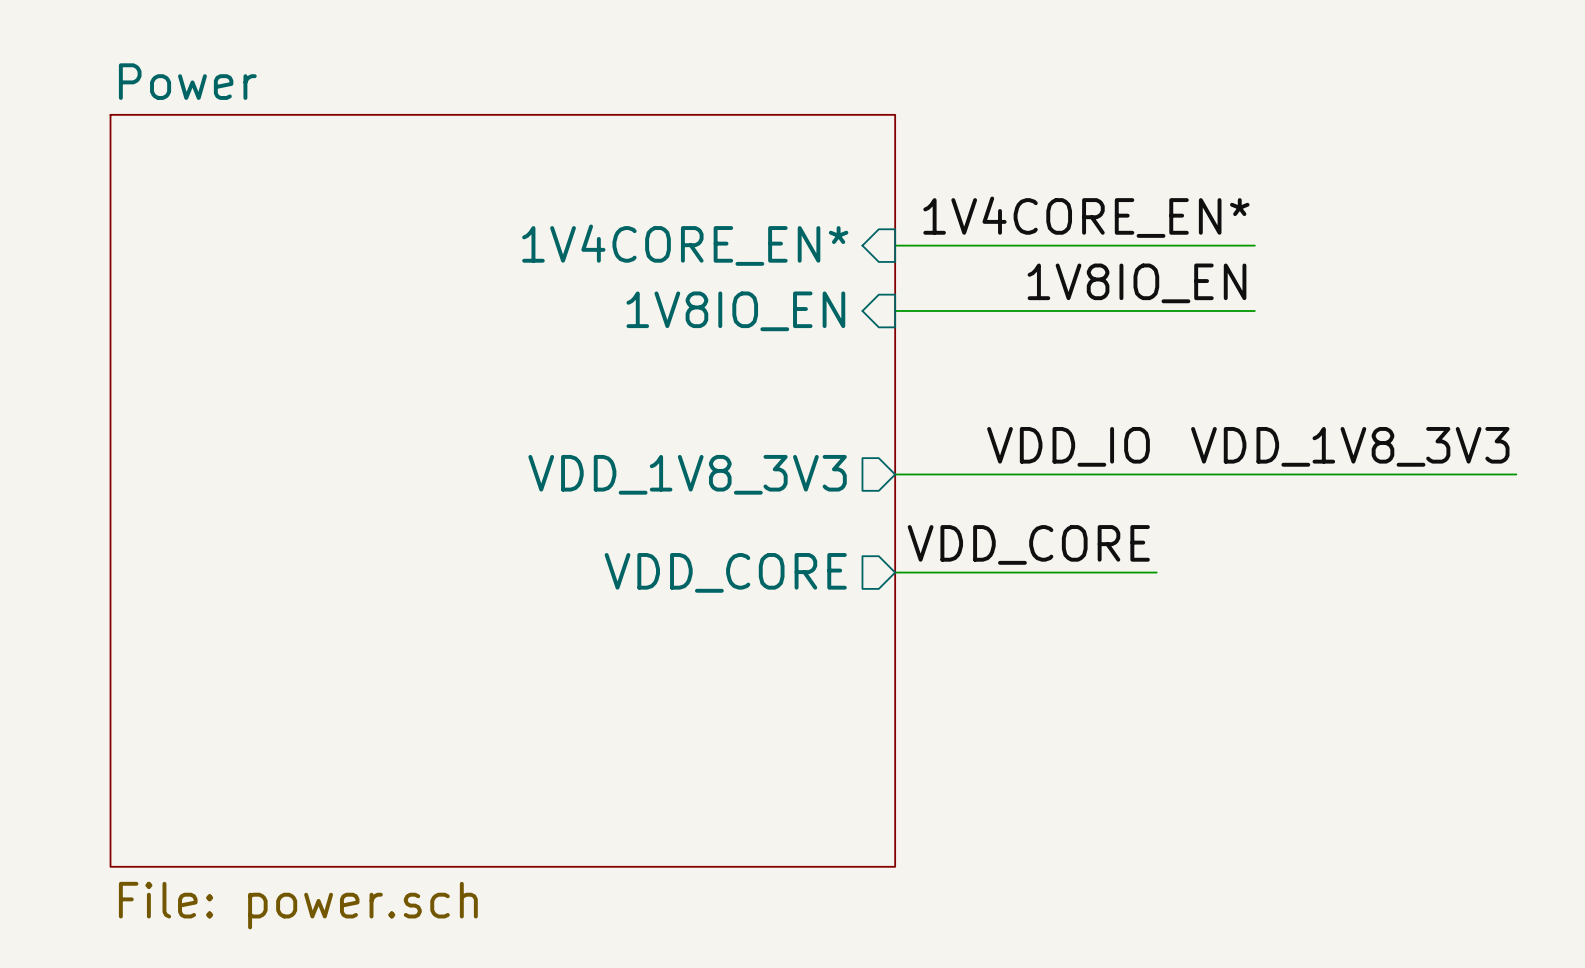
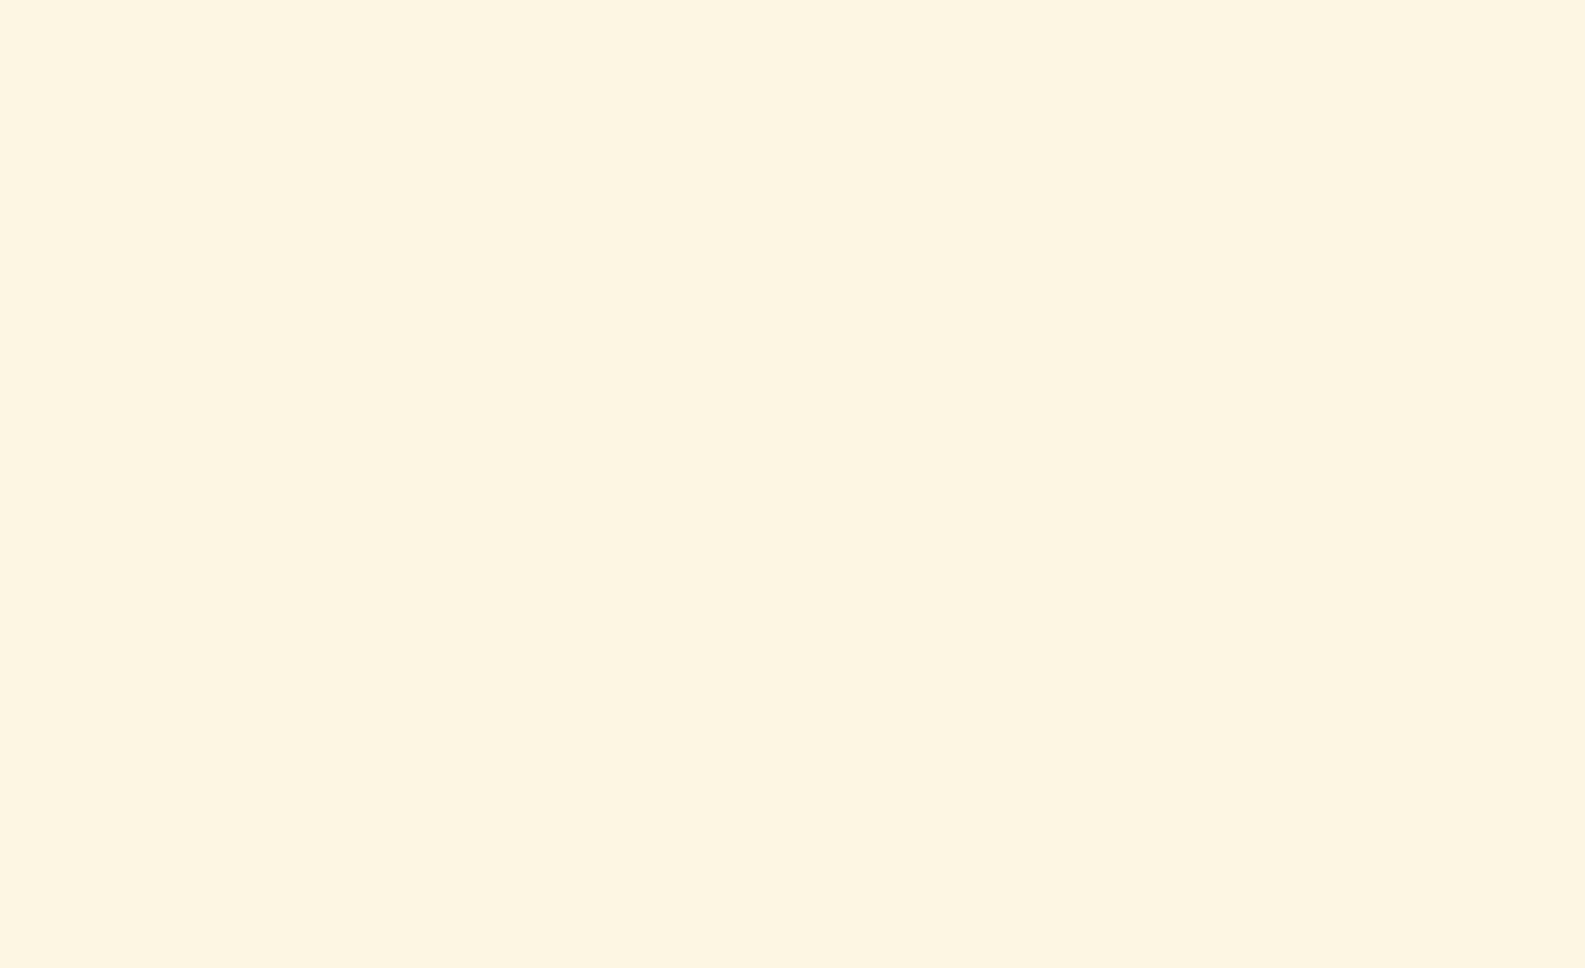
label: 1V4CORE_EN* (1086, 217) -> none
sheet pin: 1V4CORE_EN* (685, 245) -> none
wire: (895, 245) (1254, 245) -> none
label: 1V8IO_EN (1137, 283) -> none
sheet pin: 1V8IO_EN (735, 311) -> none
wire: (895, 311) (1254, 311) -> none
label: VDD_IO (1068, 446) -> none
label: VDD_1V8_3V3 (1350, 446) -> none
sheet pin: VDD_1V8_3V3 (687, 474) -> none
wire: (895, 474) (1516, 474) -> none
sheet Power: File: power.sch (502, 490) -> none
label: VDD_CORE (1028, 544) -> none
sheet pin: VDD_CORE (725, 572) -> none
wire: (895, 572) (1156, 572) -> none

